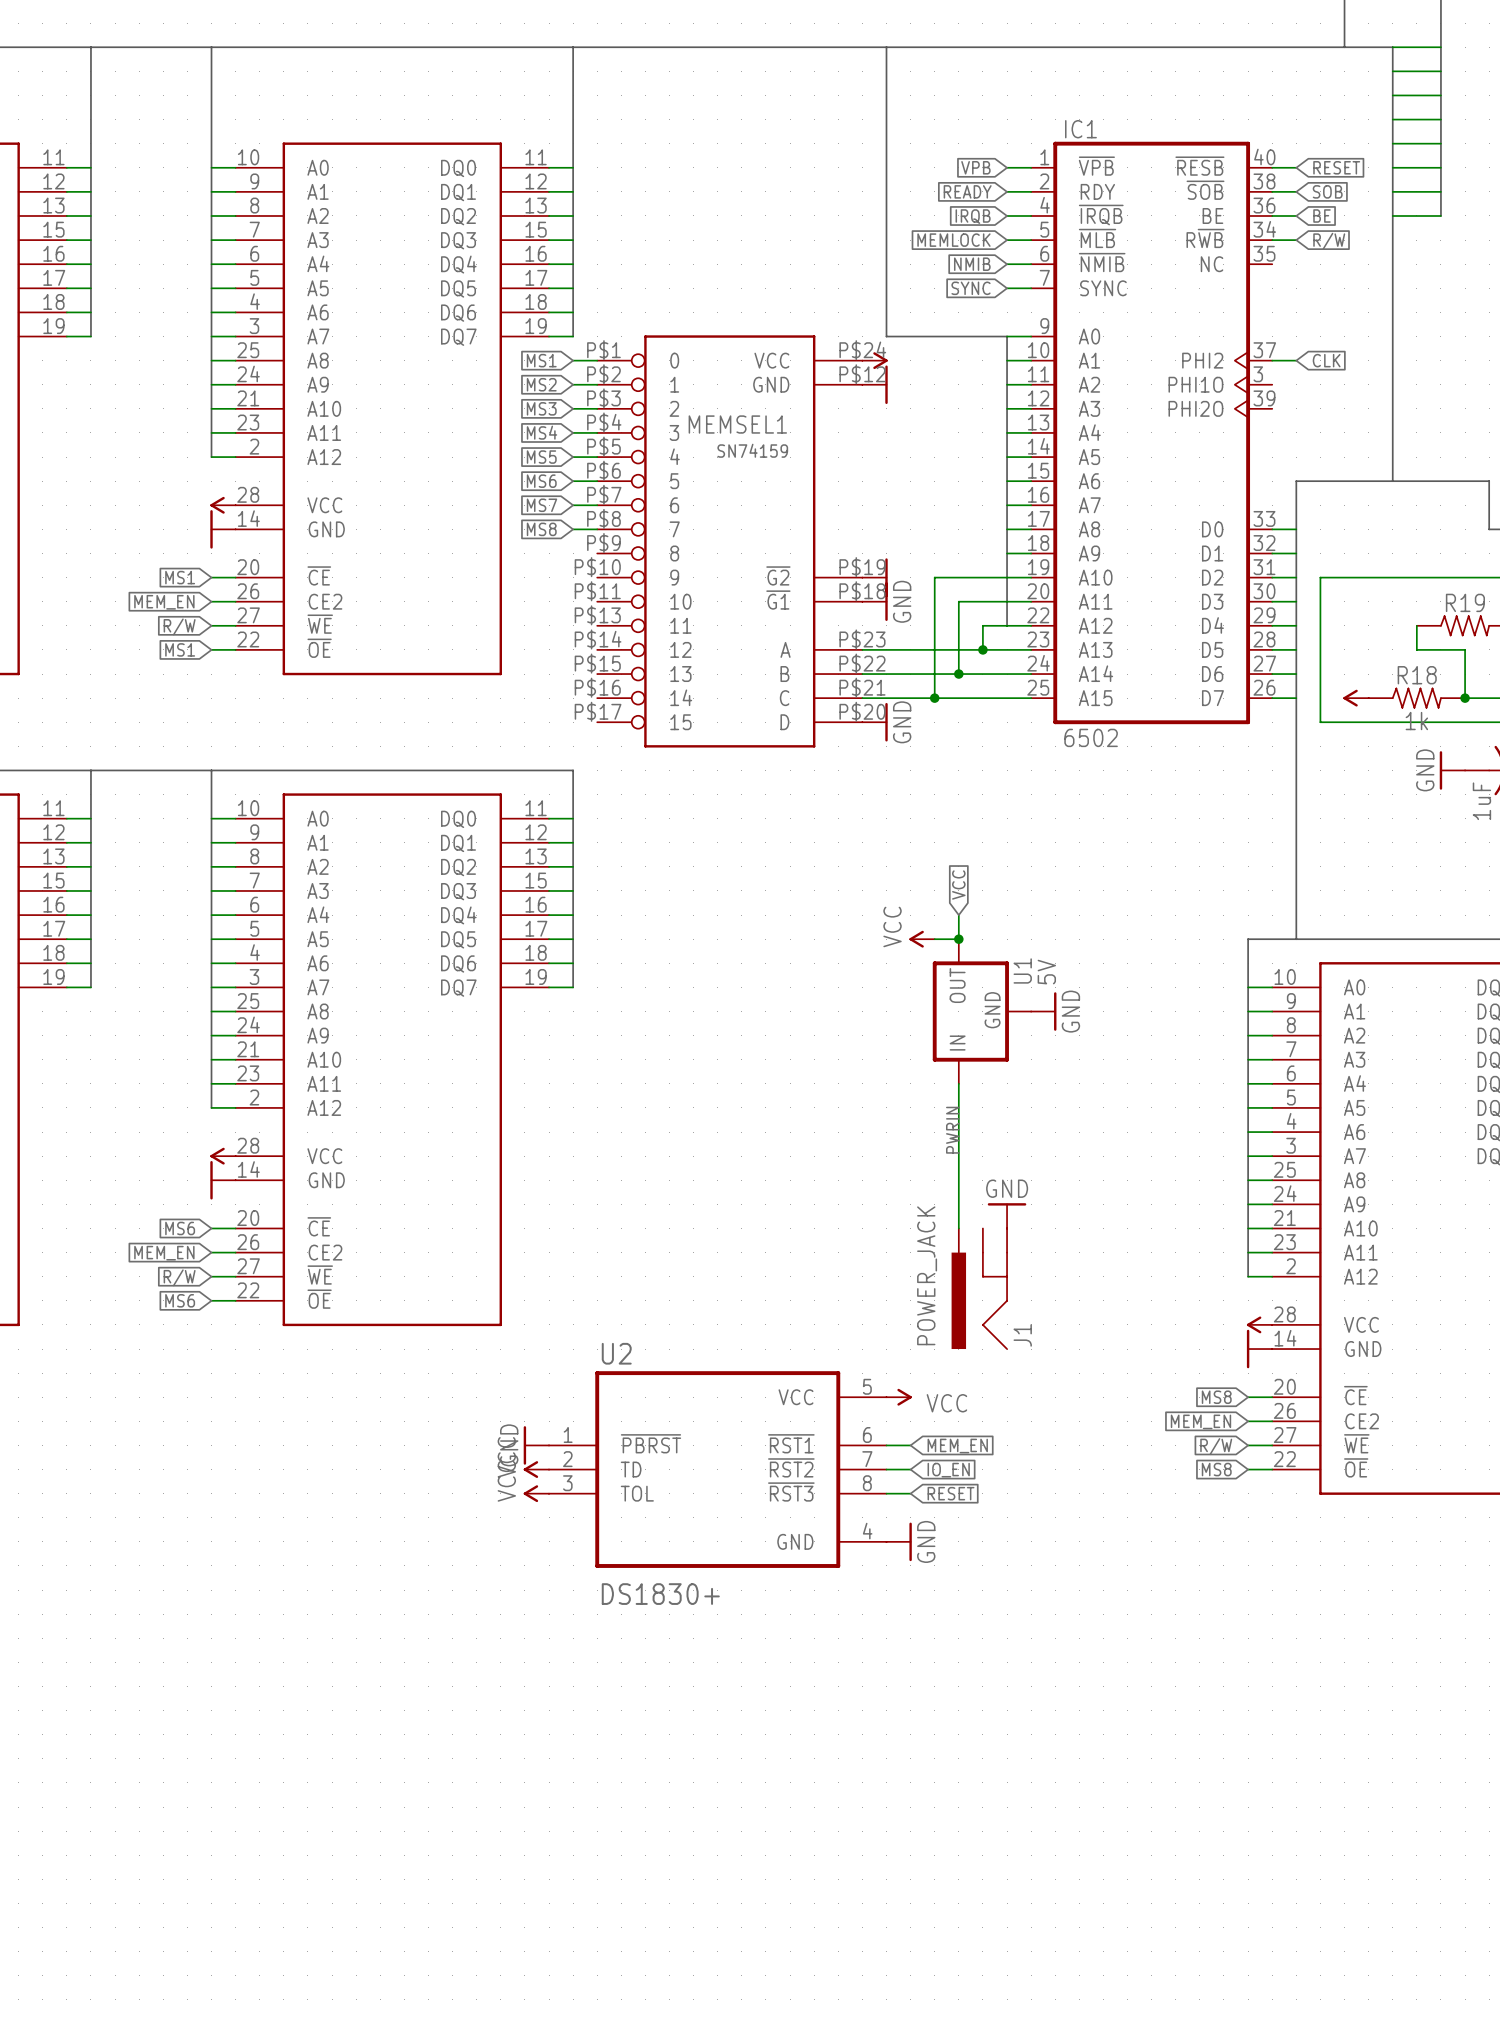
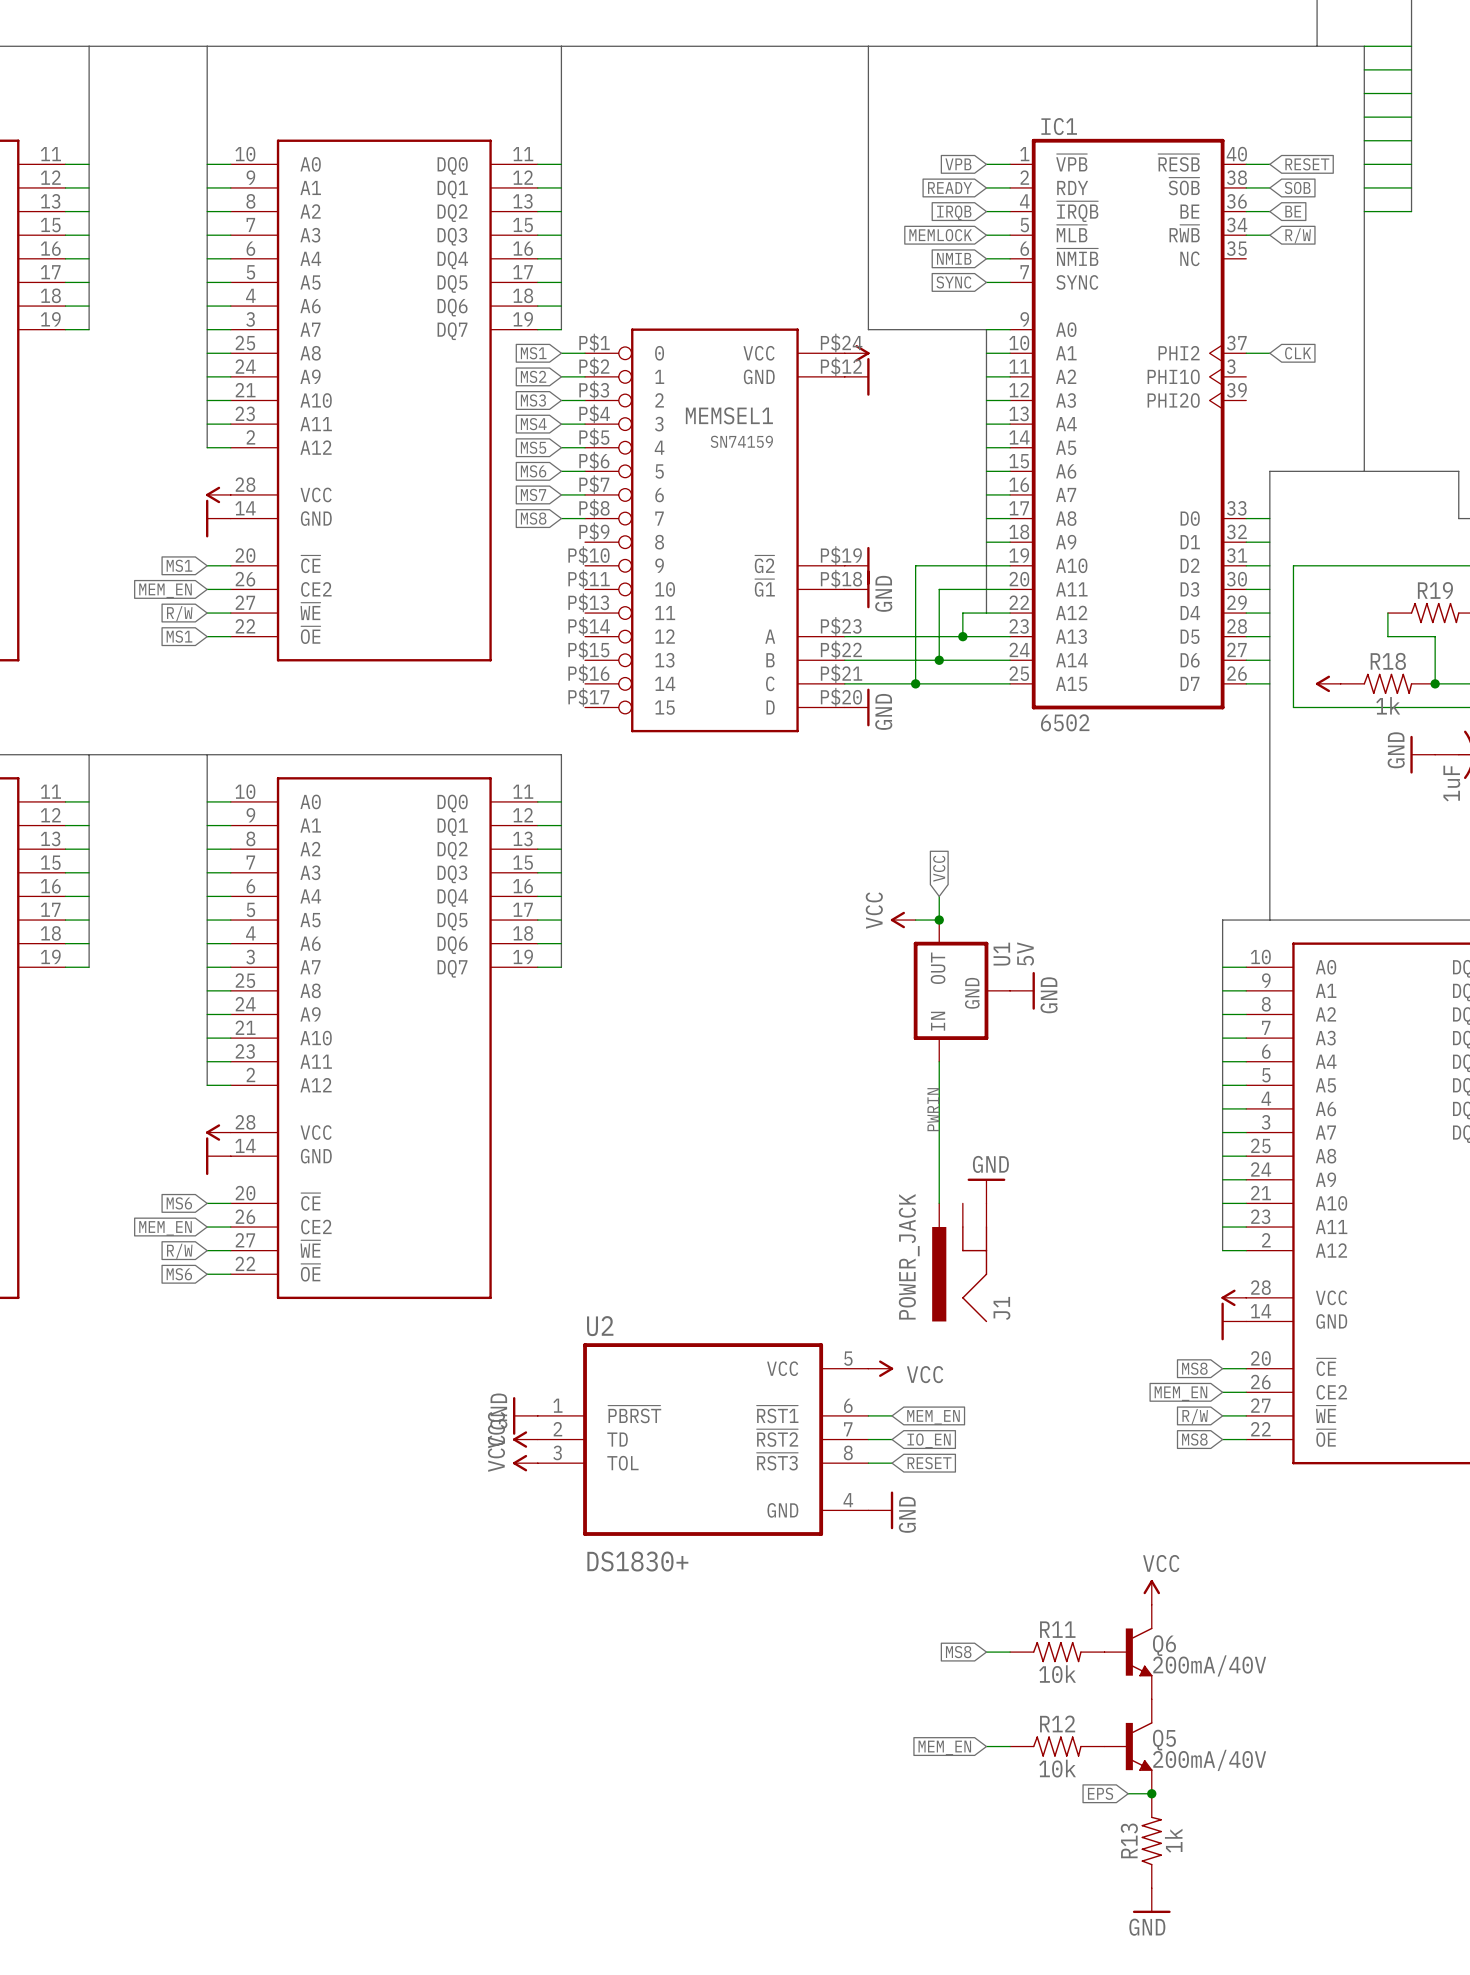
power symbol: none -> VCC (1151, 1592)
global label: none -> MS8 (958, 1652)
wire: none -> (986, 1652) (1010, 1652)
R11: none -> 10k (1057, 1652)
Q6: none -> 200mA/40V (1128, 1652)
wire: none -> (986, 1746) (1010, 1746)
R12: none -> 10k (1057, 1746)
Q5: none -> 200mA/40V (1128, 1746)
global label: none -> MEM_EN (944, 1747)
global label: none -> EPS (1100, 1793)
wire: none -> (1128, 1793) (1151, 1793)
junction: none -> (1151, 1793)
R13: none -> 1k (1151, 1840)
power symbol: none -> GND (1151, 1900)

